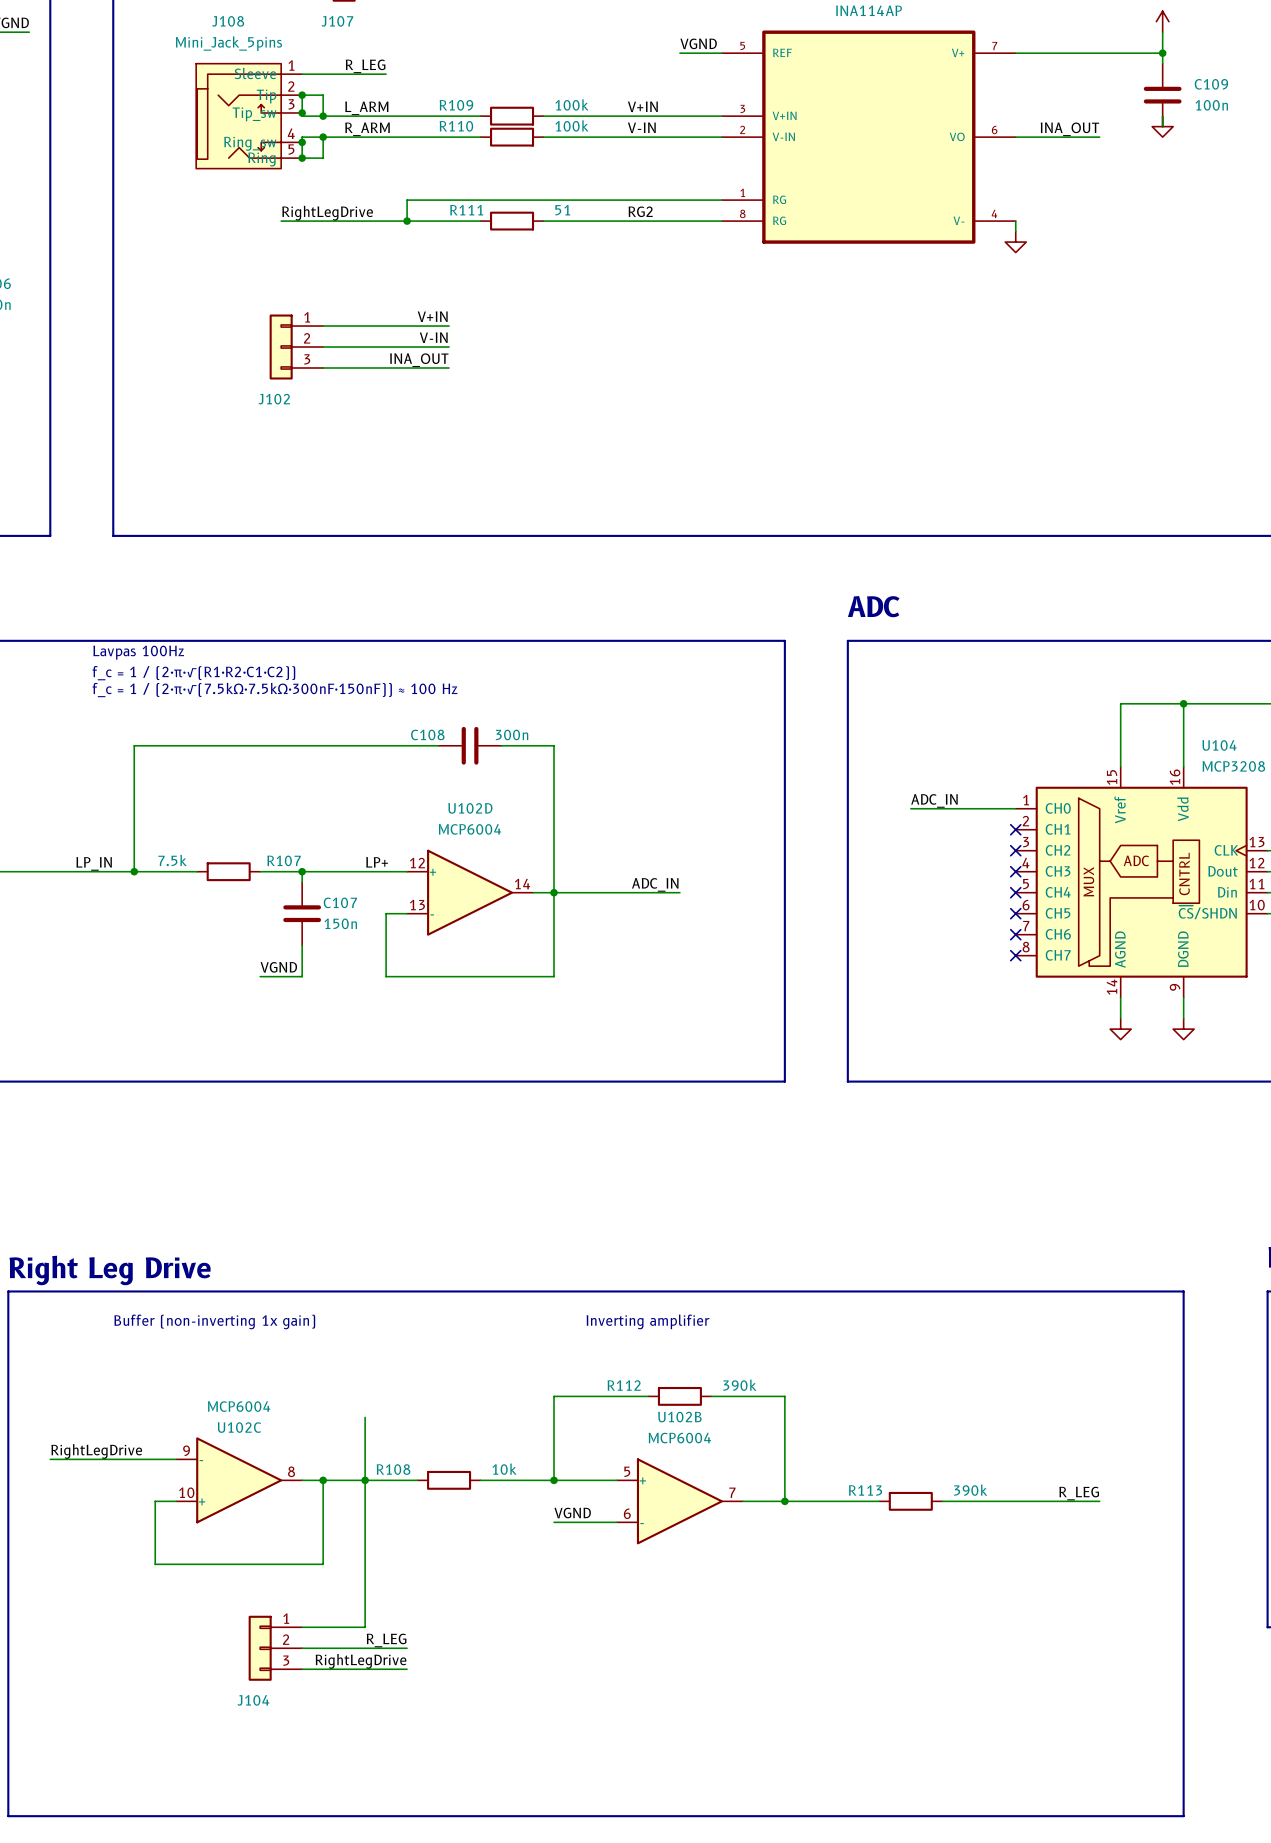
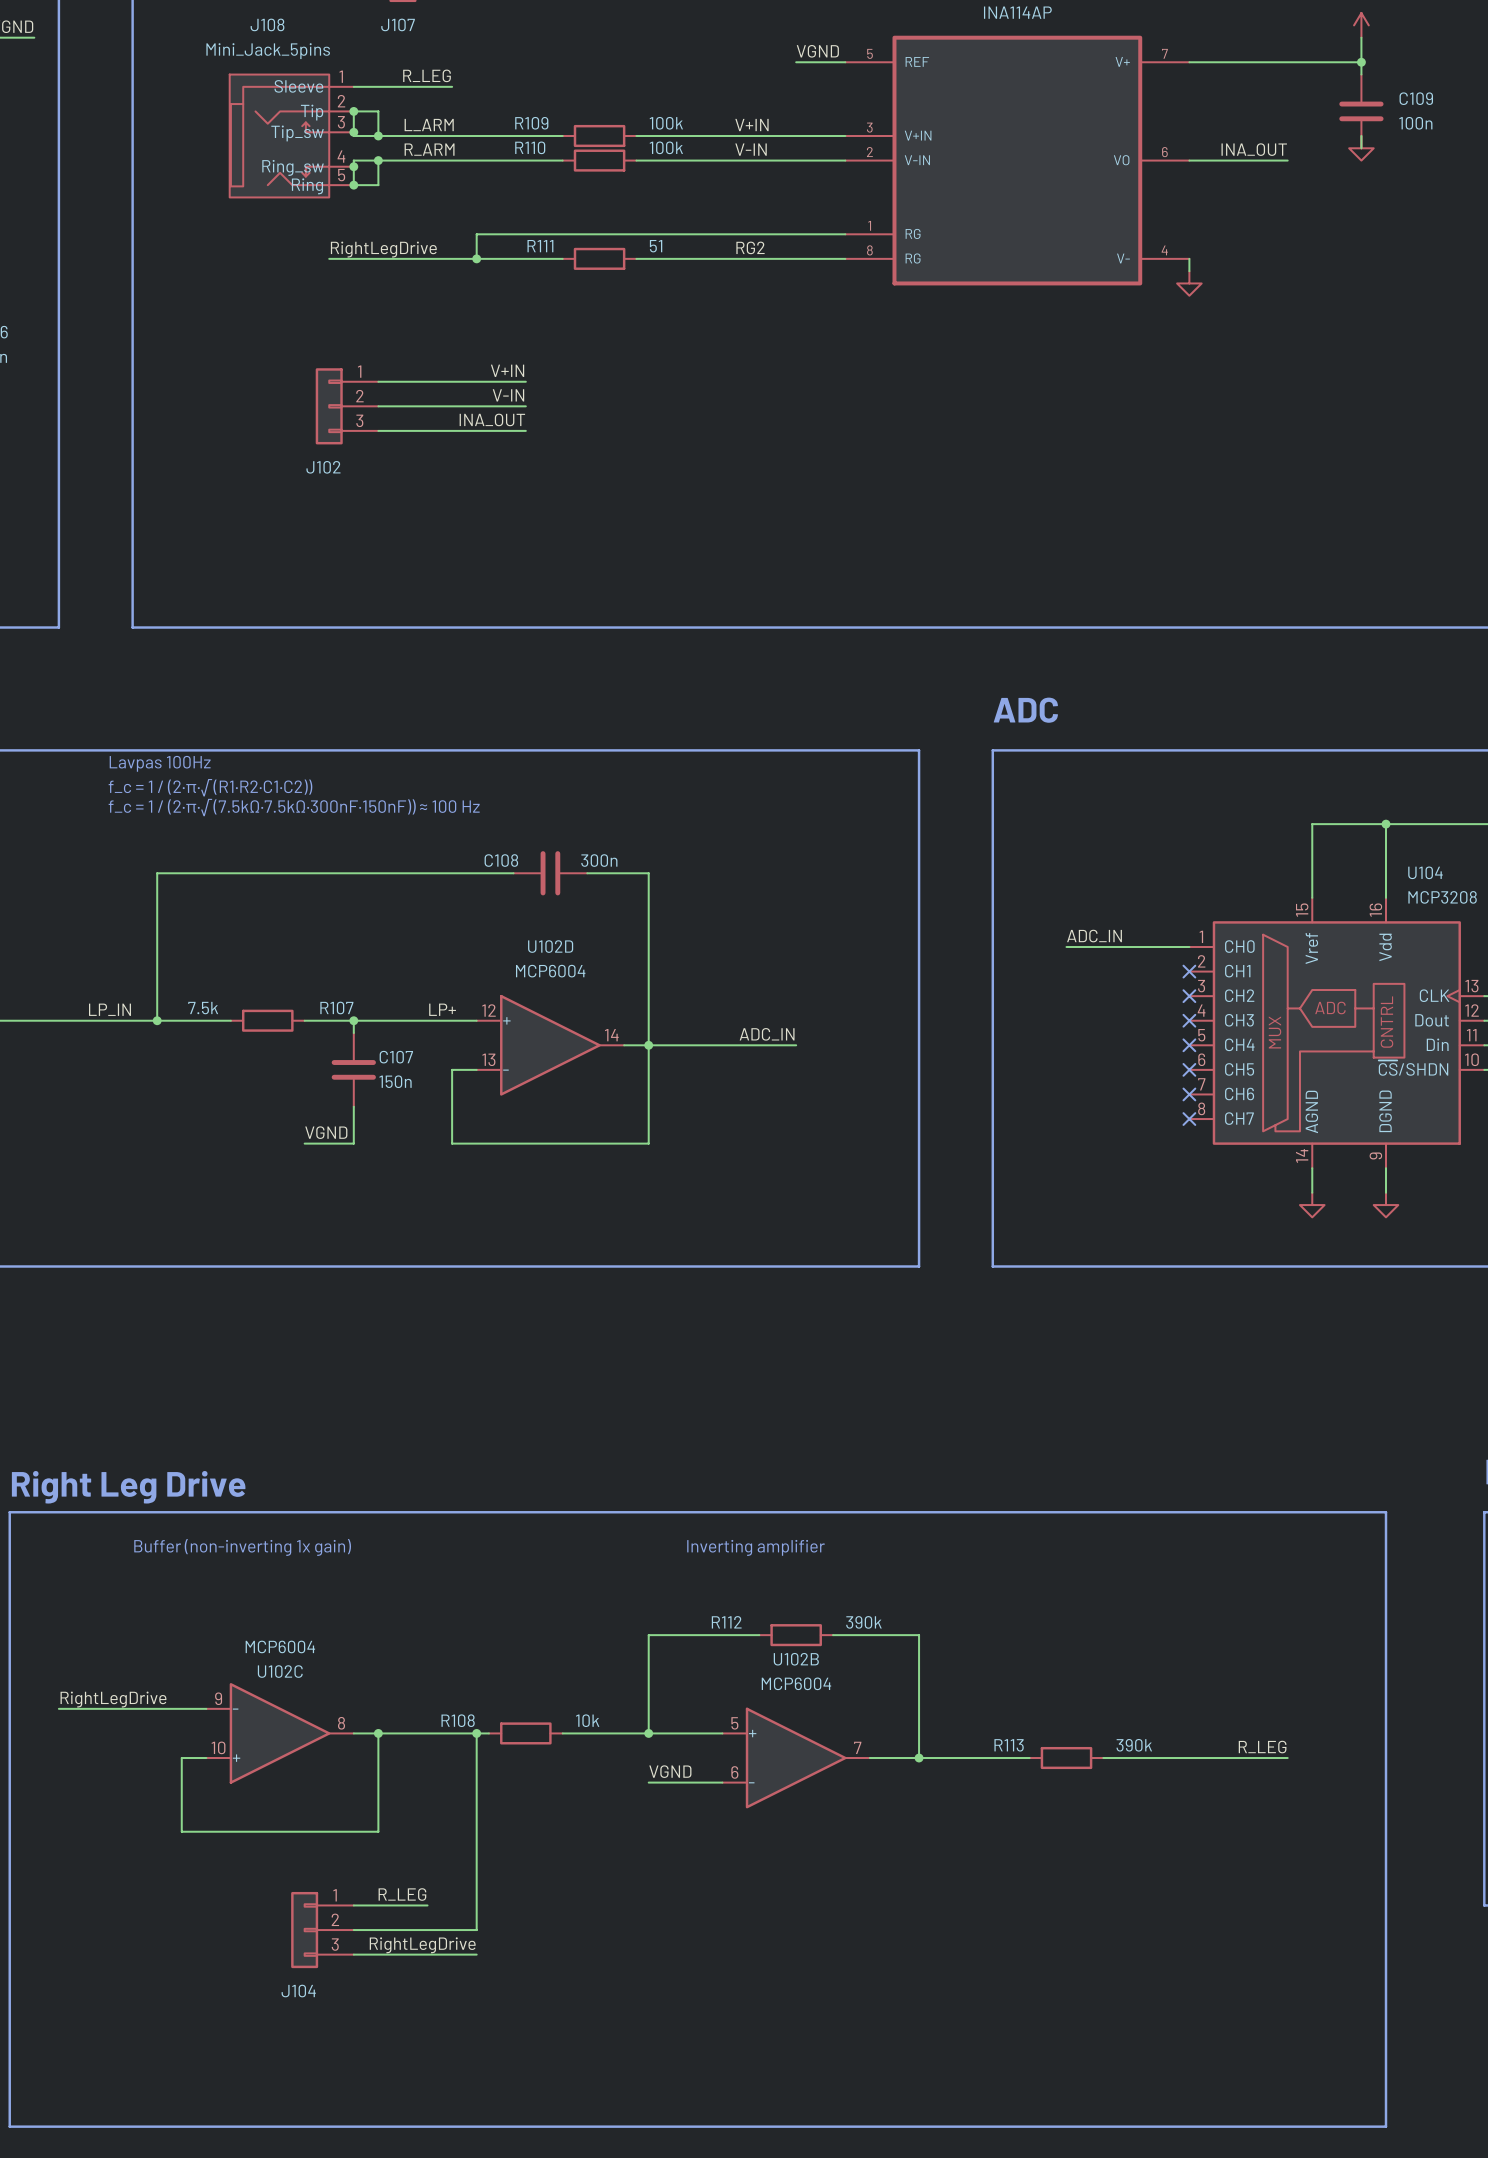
wire: (365, 1417) (365, 1627) -> none
junction position: (365, 1480) -> (476, 1733)
wire: none -> (476, 1733) (476, 1930)
label position: R_LEG (386, 1640) -> R_LEG (402, 1894)

